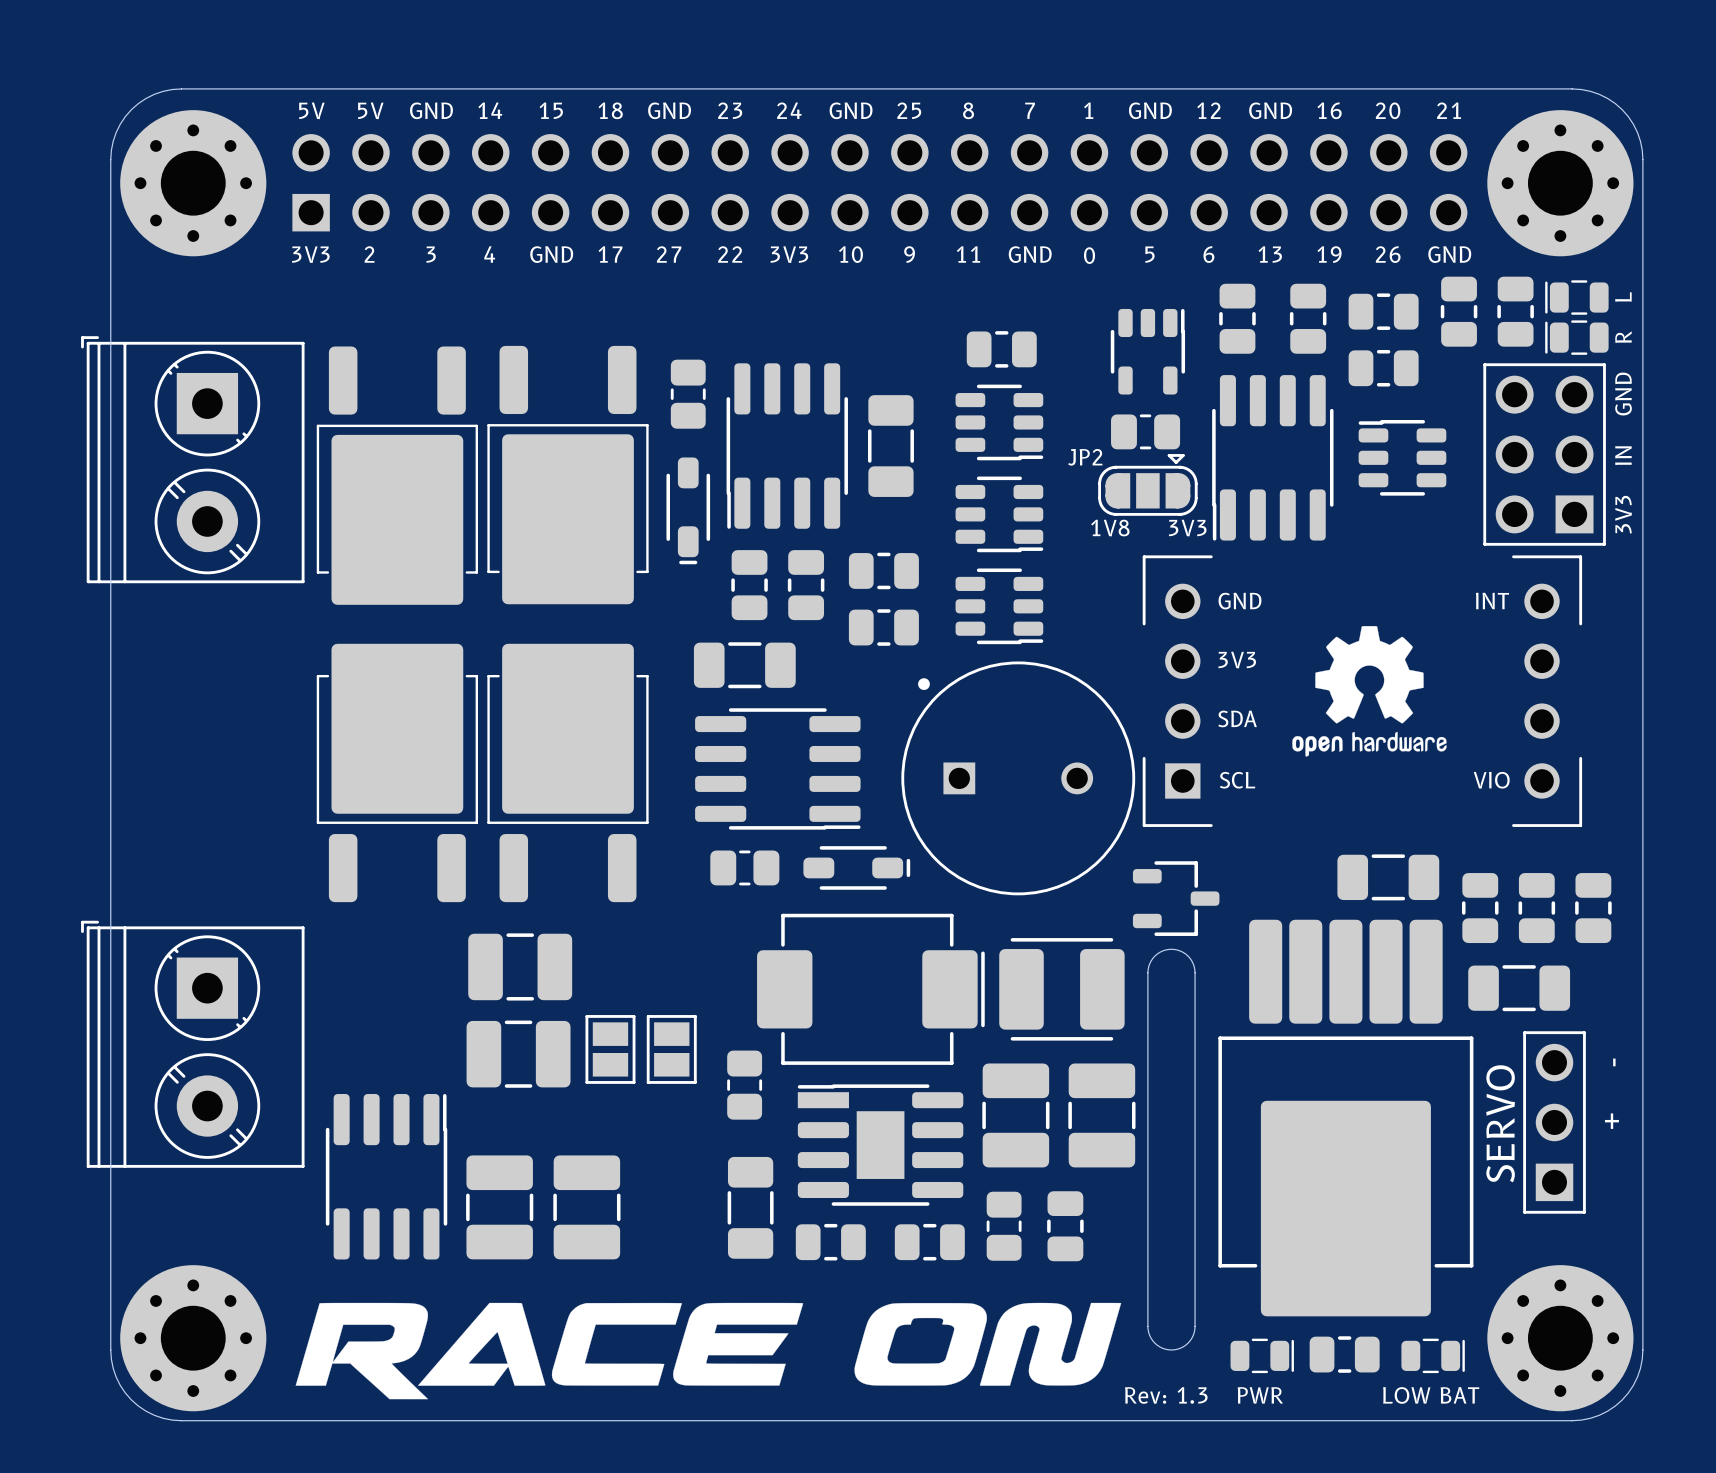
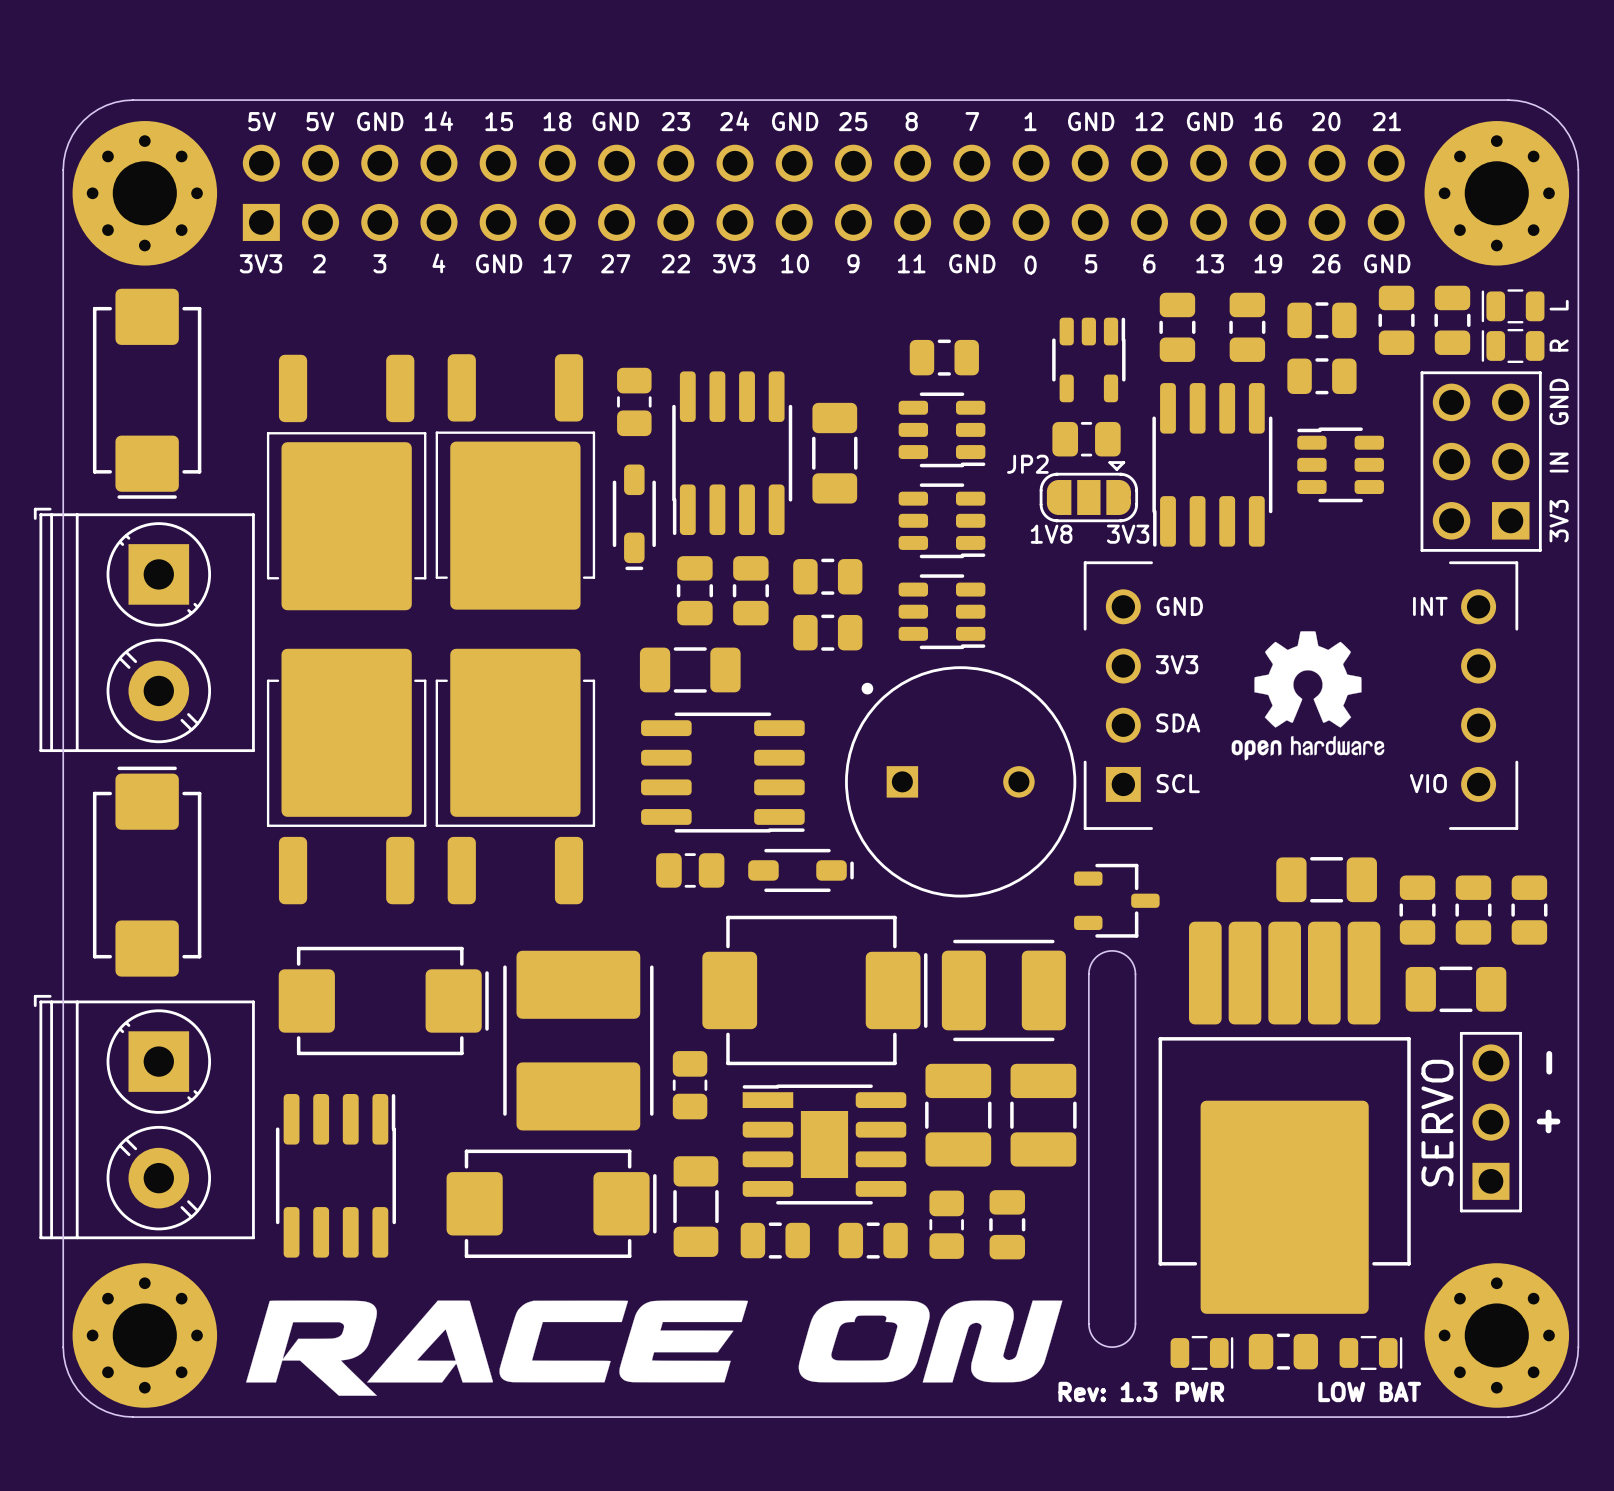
part: none -> (147, 393)
part position: (192, 459) -> (144, 629)
part: none -> (147, 871)
part: (520, 966) -> none
part: none -> (383, 1000)
part: none -> (578, 1040)
part position: (192, 1044) -> (144, 1117)
part: (610, 1049) -> none
part: (671, 1049) -> none
part: (518, 1054) -> none
part footprint: [553, 1155, 621, 1260] -> [446, 1149, 657, 1258]
part: (499, 1207) -> none

